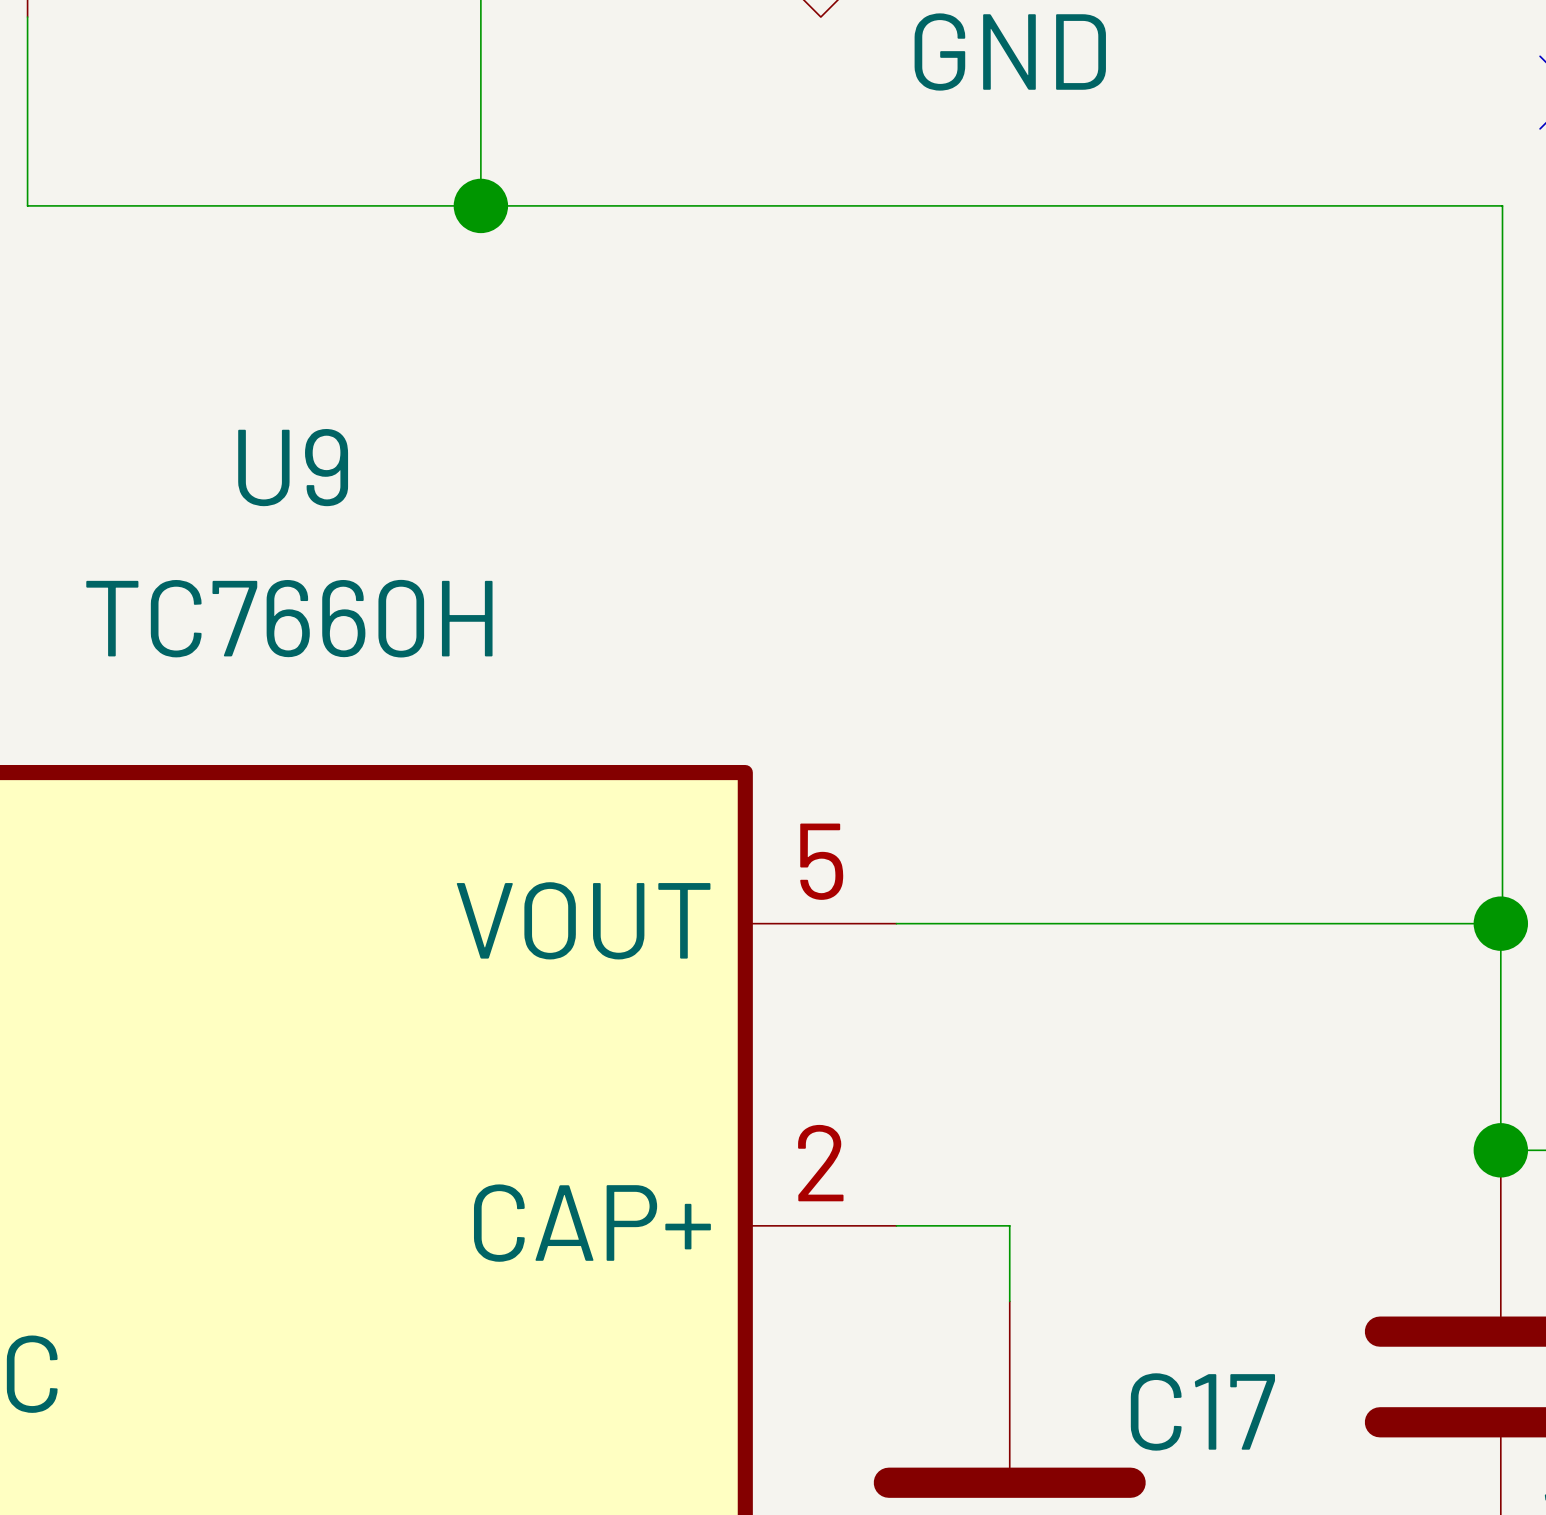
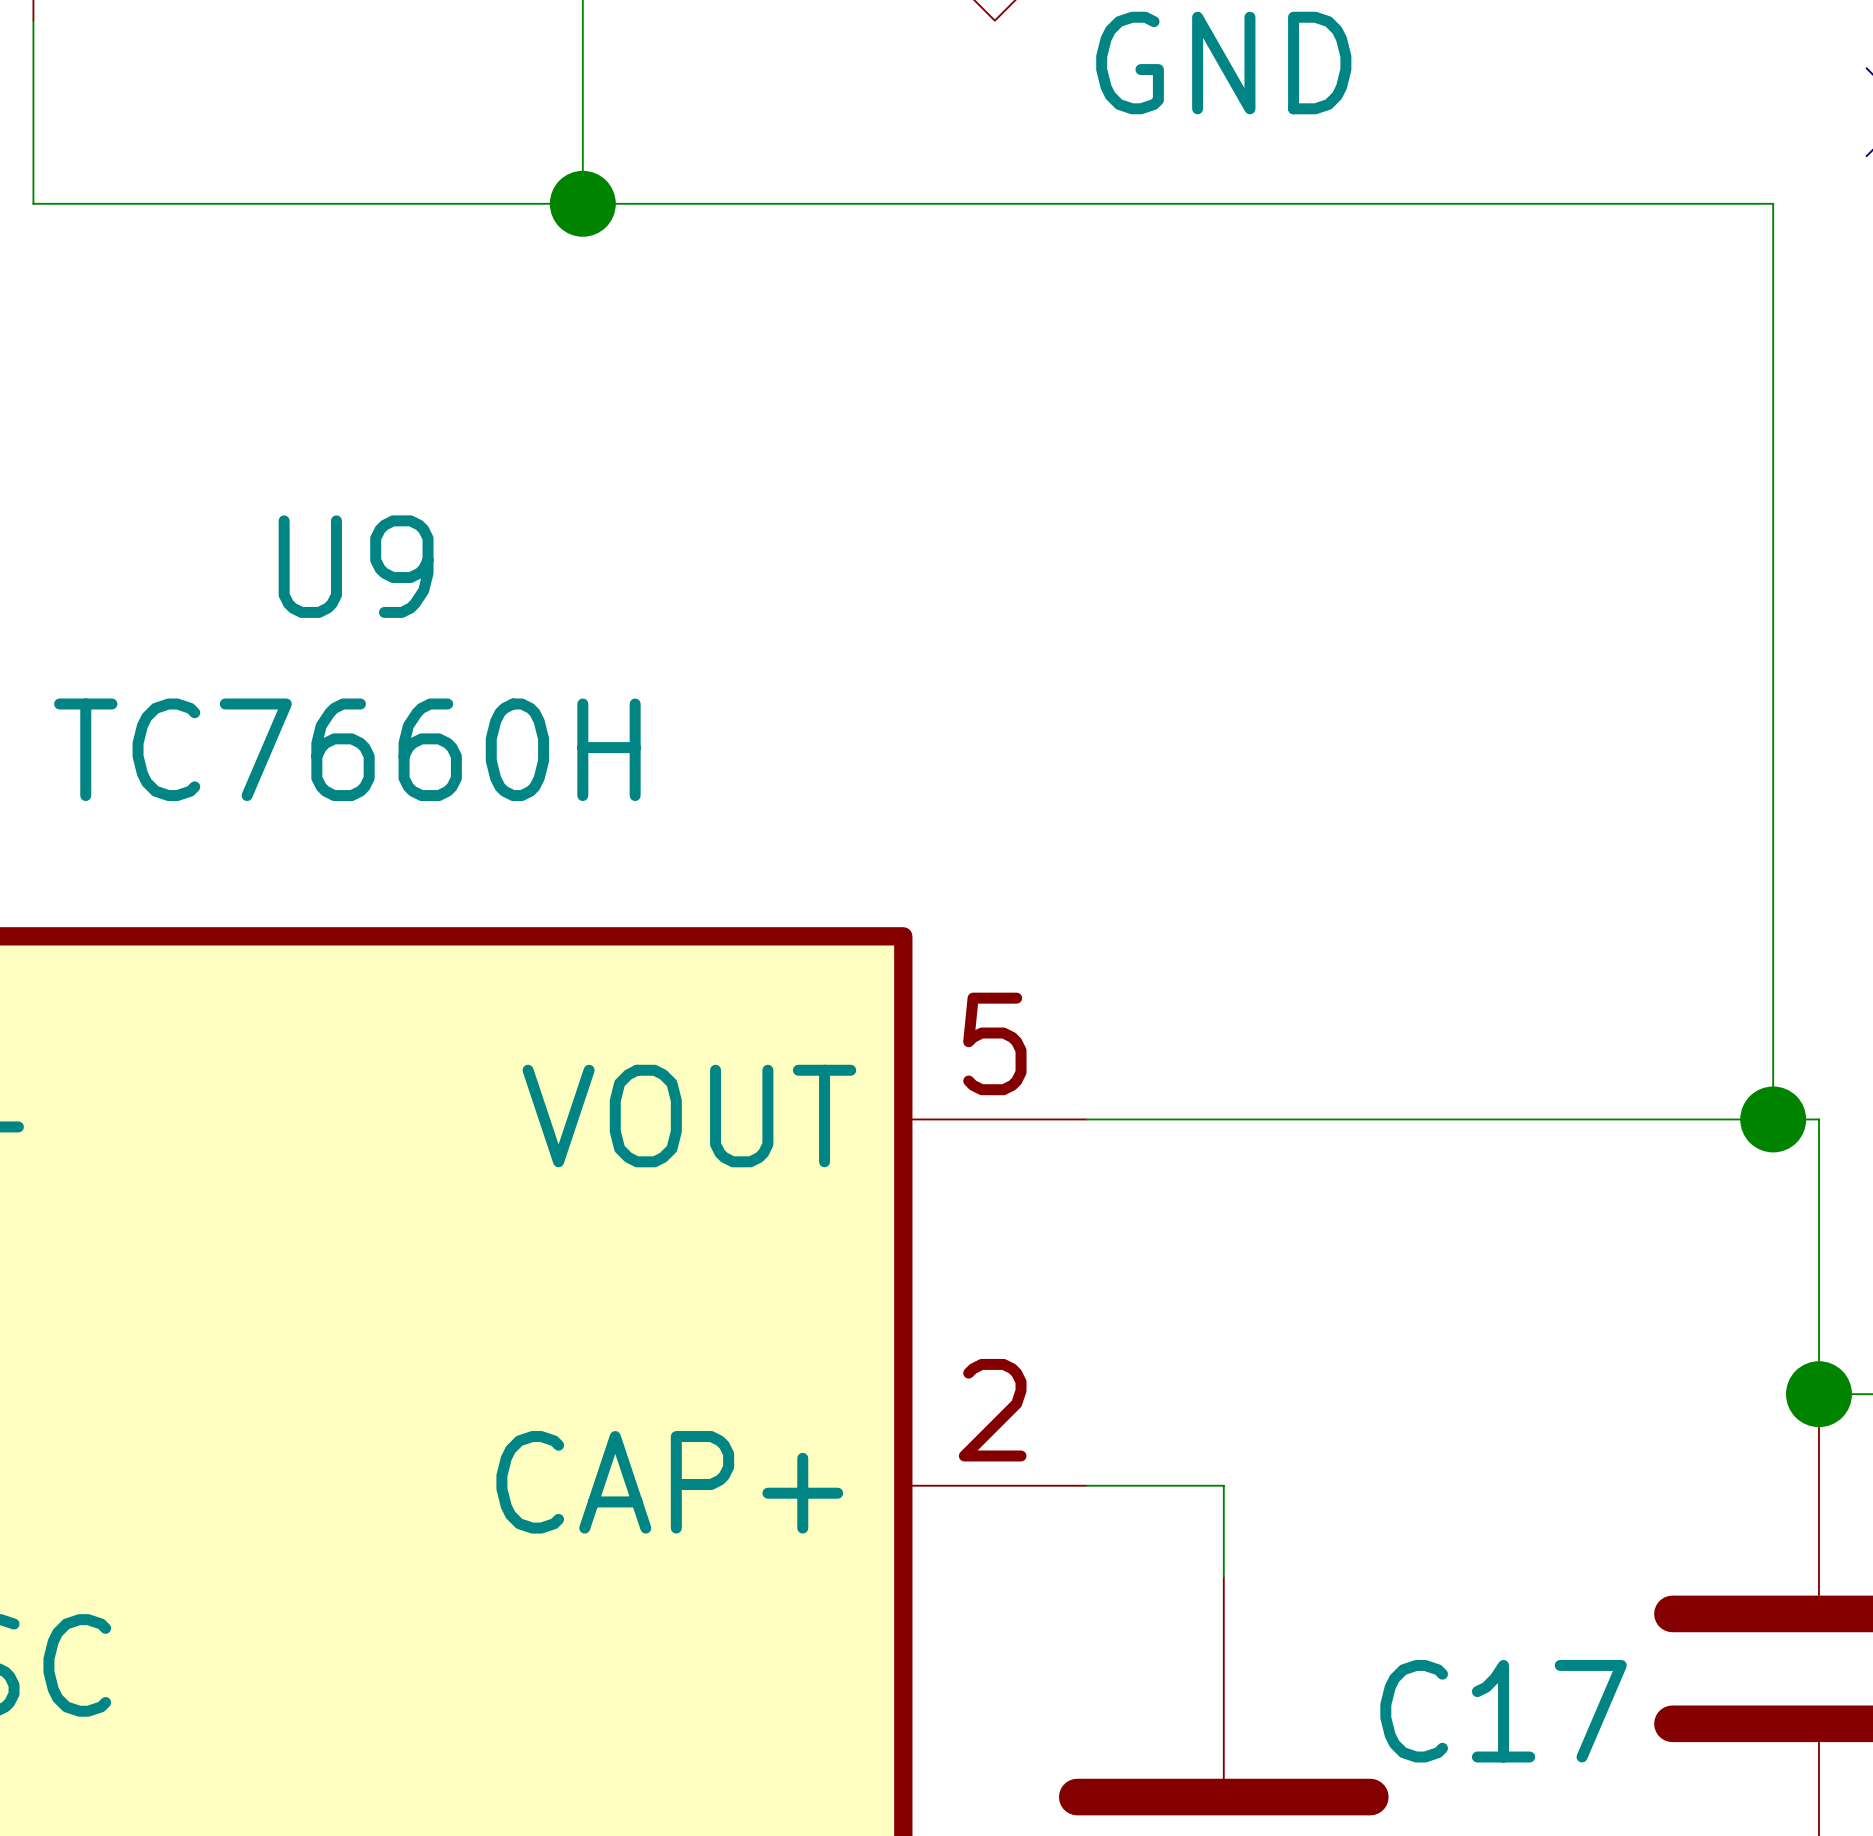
wire: (27, 168) (27, 205) (1502, 205) (1502, 923) (1500, 923) -> (33, 203) (1773, 203) (1773, 1119)
junction position: (480, 205) -> (582, 203)
junction position: (1500, 923) -> (1773, 1119)

